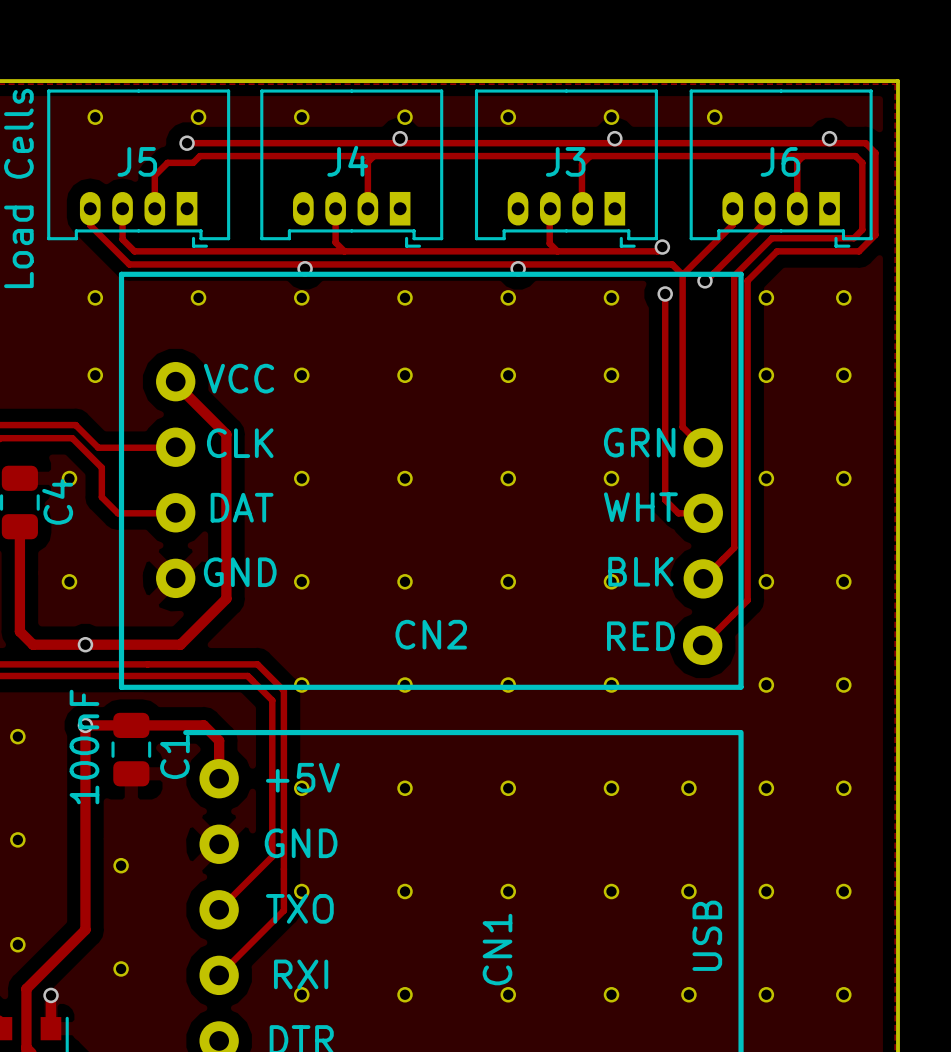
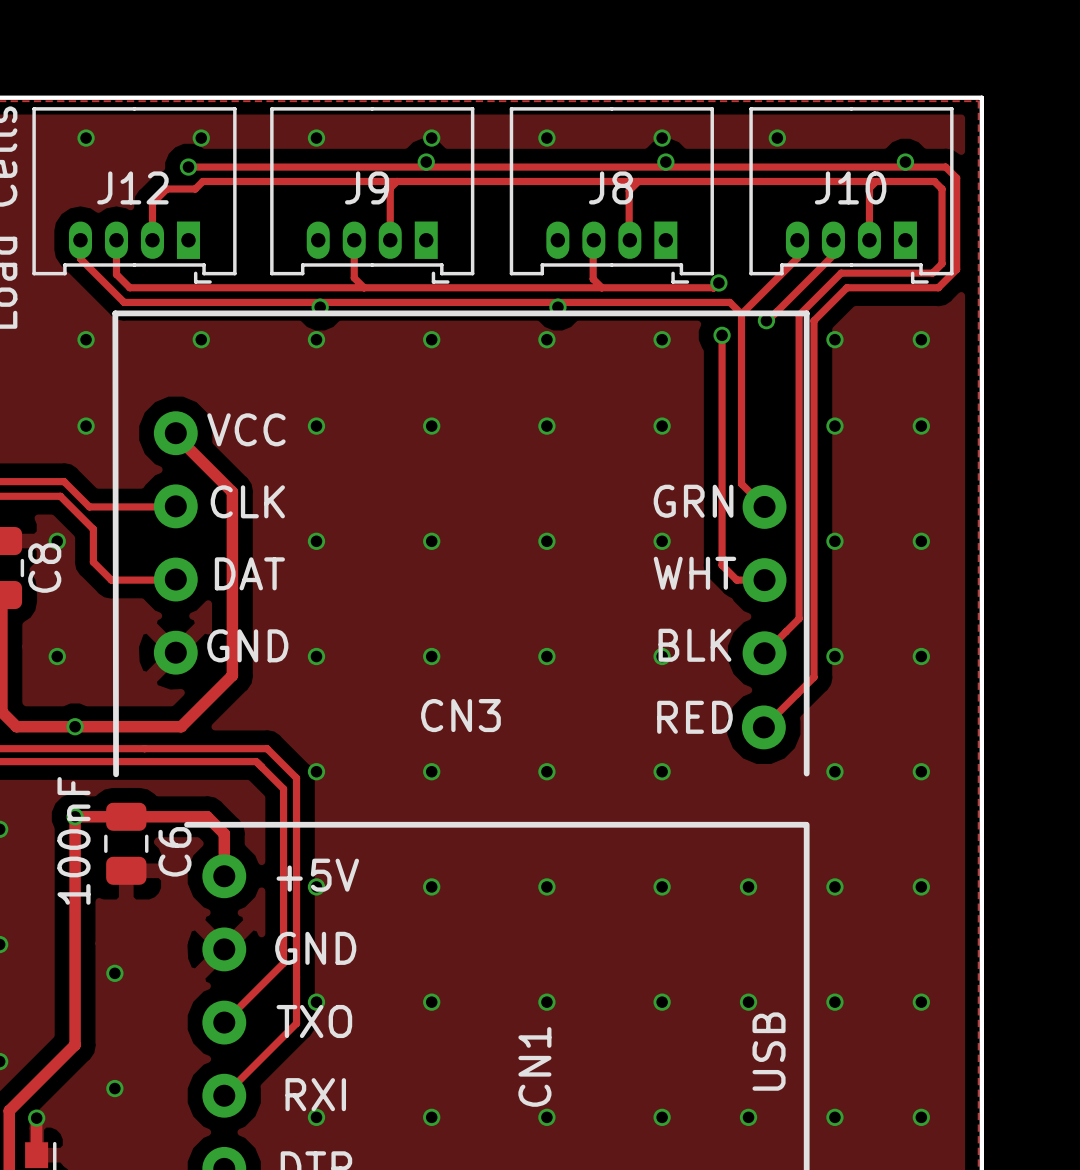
J5 name: J5 (137, 161) -> J12 (132, 187)
J4 name: J4 (347, 161) -> J9 (367, 187)
J3 name: J3 (565, 161) -> J8 (611, 187)
J6 name: J6 (780, 161) -> J10 (850, 187)
line: (121, 274) (121, 687) (741, 687) -> (115, 313) (116, 774)
C4 name: C4 (57, 501) -> C8 (44, 568)
CN2 name: CN2 (431, 634) -> CN3 (460, 715)
C1 name: C1 (174, 756) -> C6 (174, 851)

